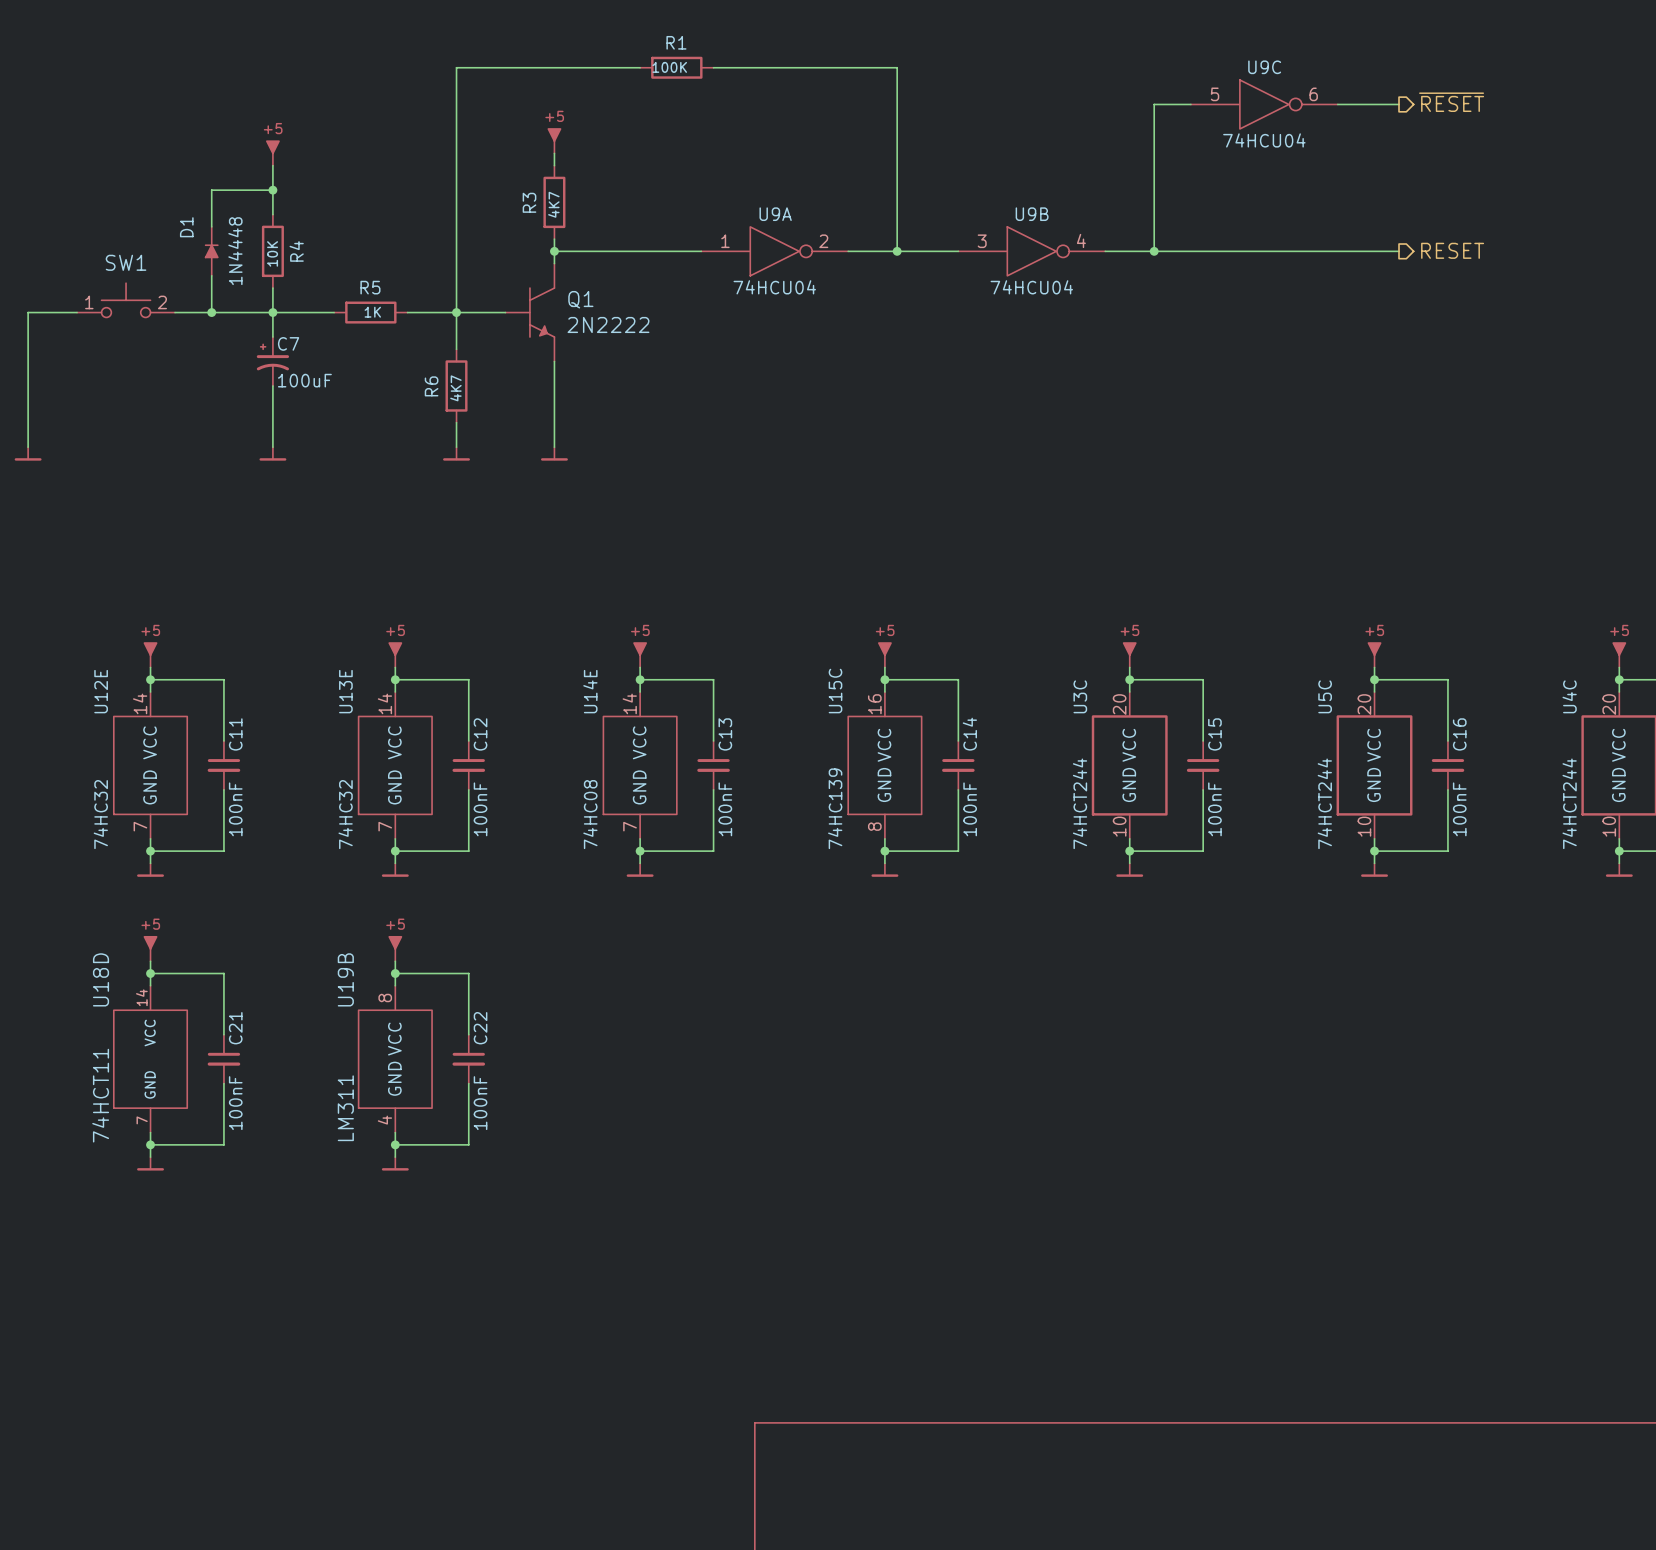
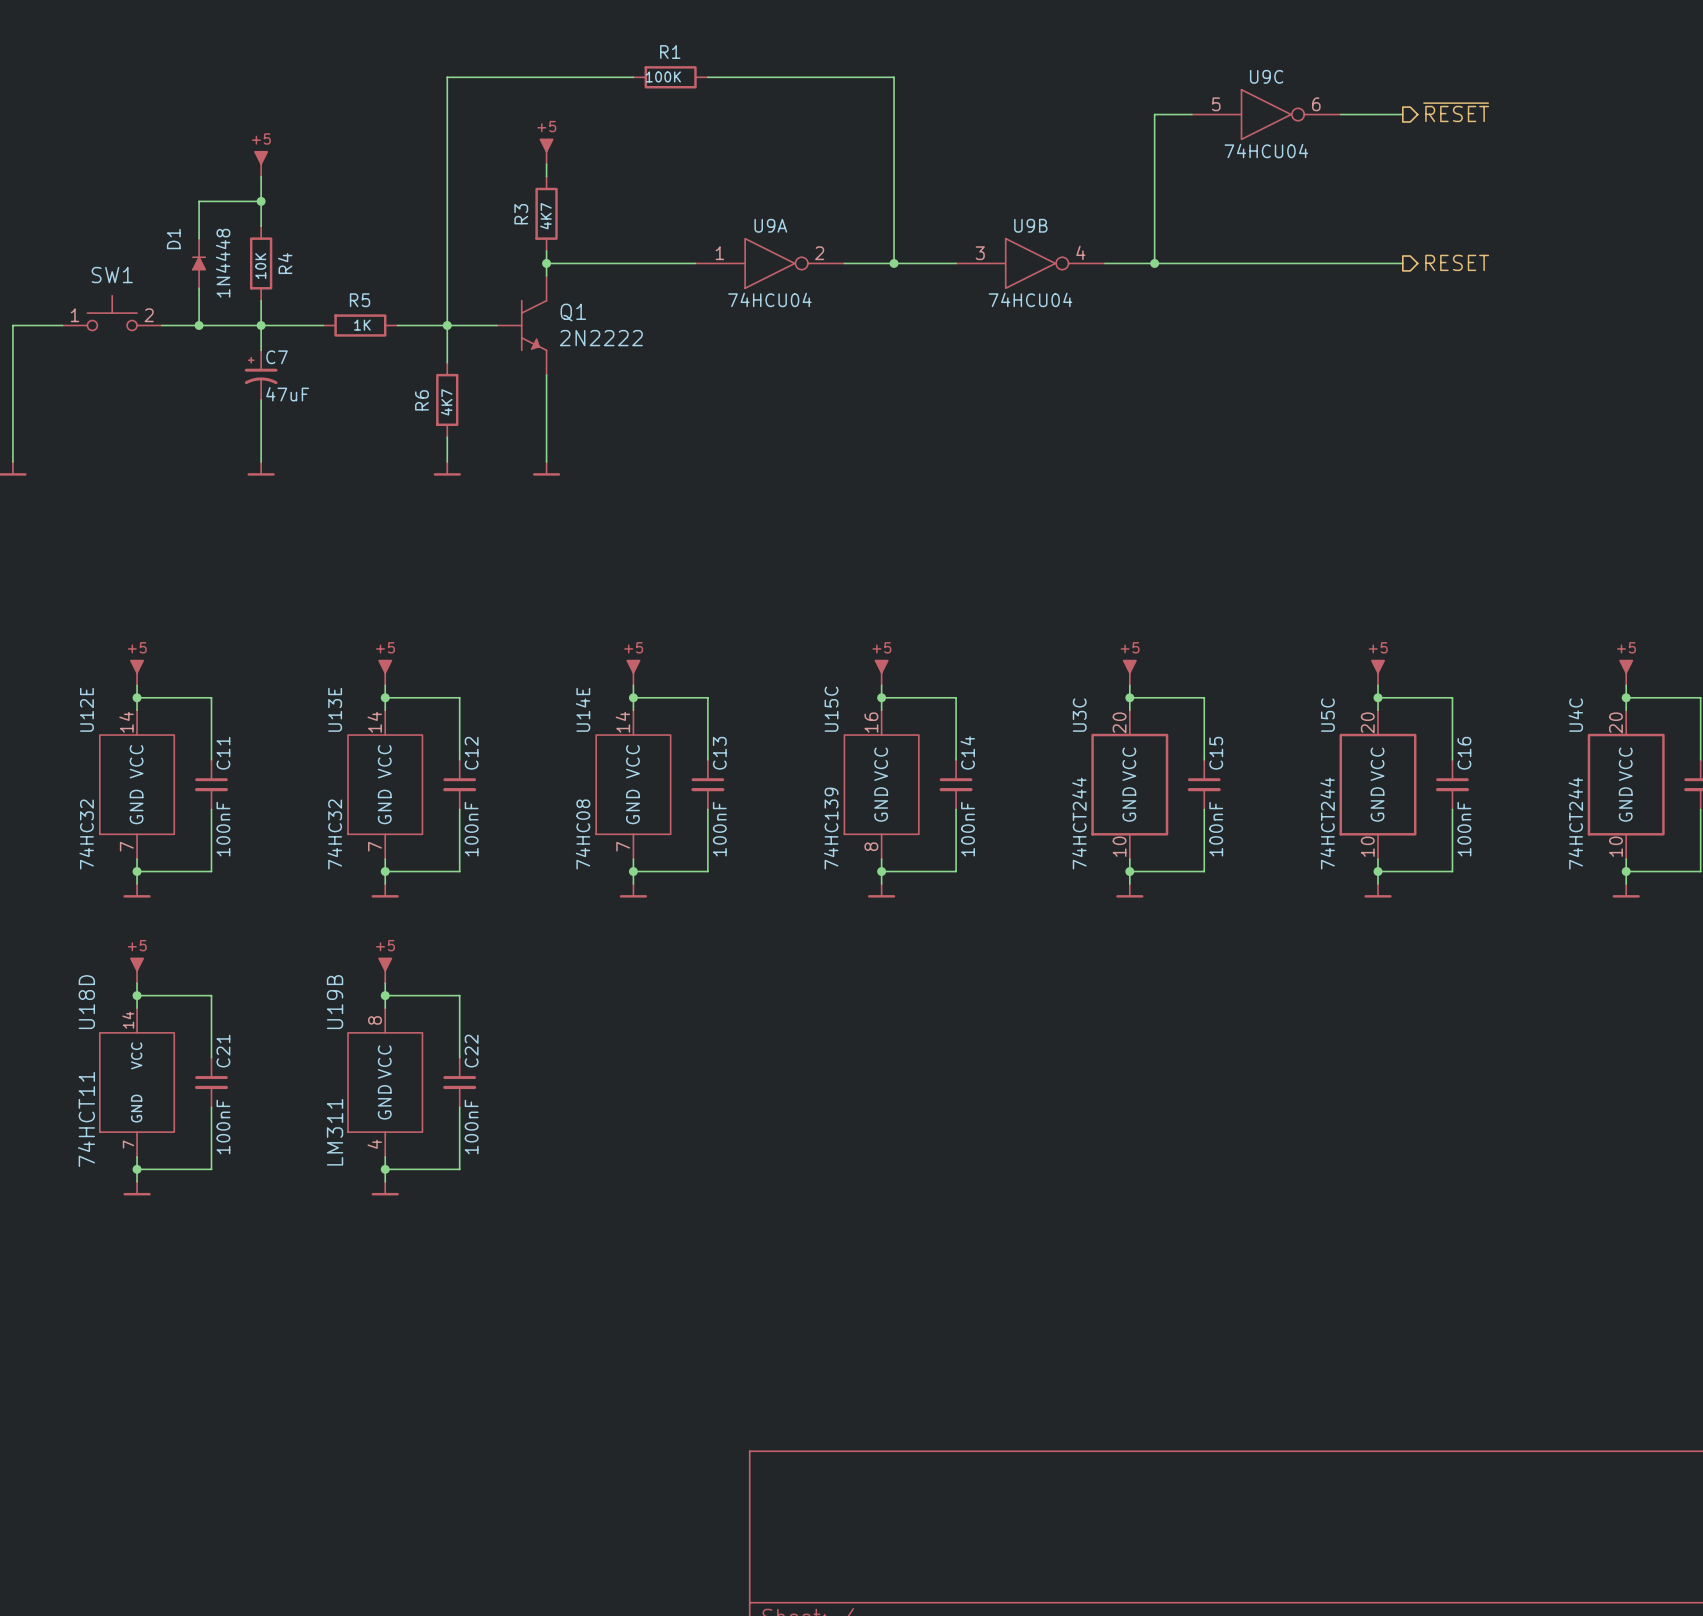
C7 value: 100uF (304, 380) -> 47uF (287, 394)

